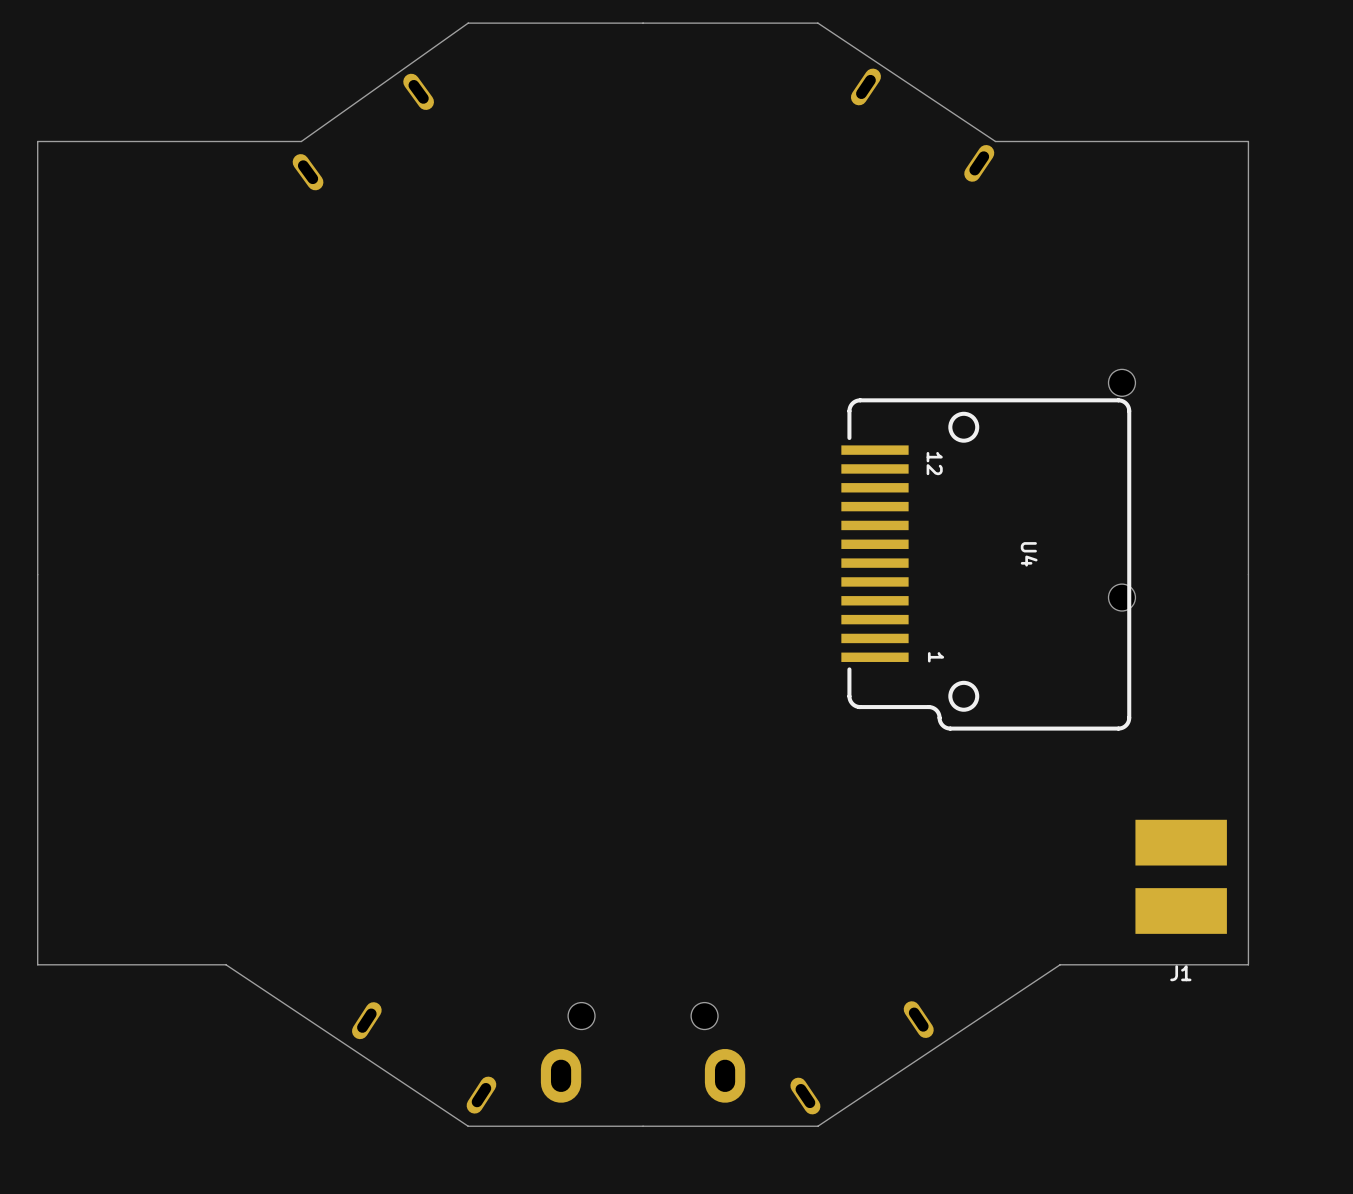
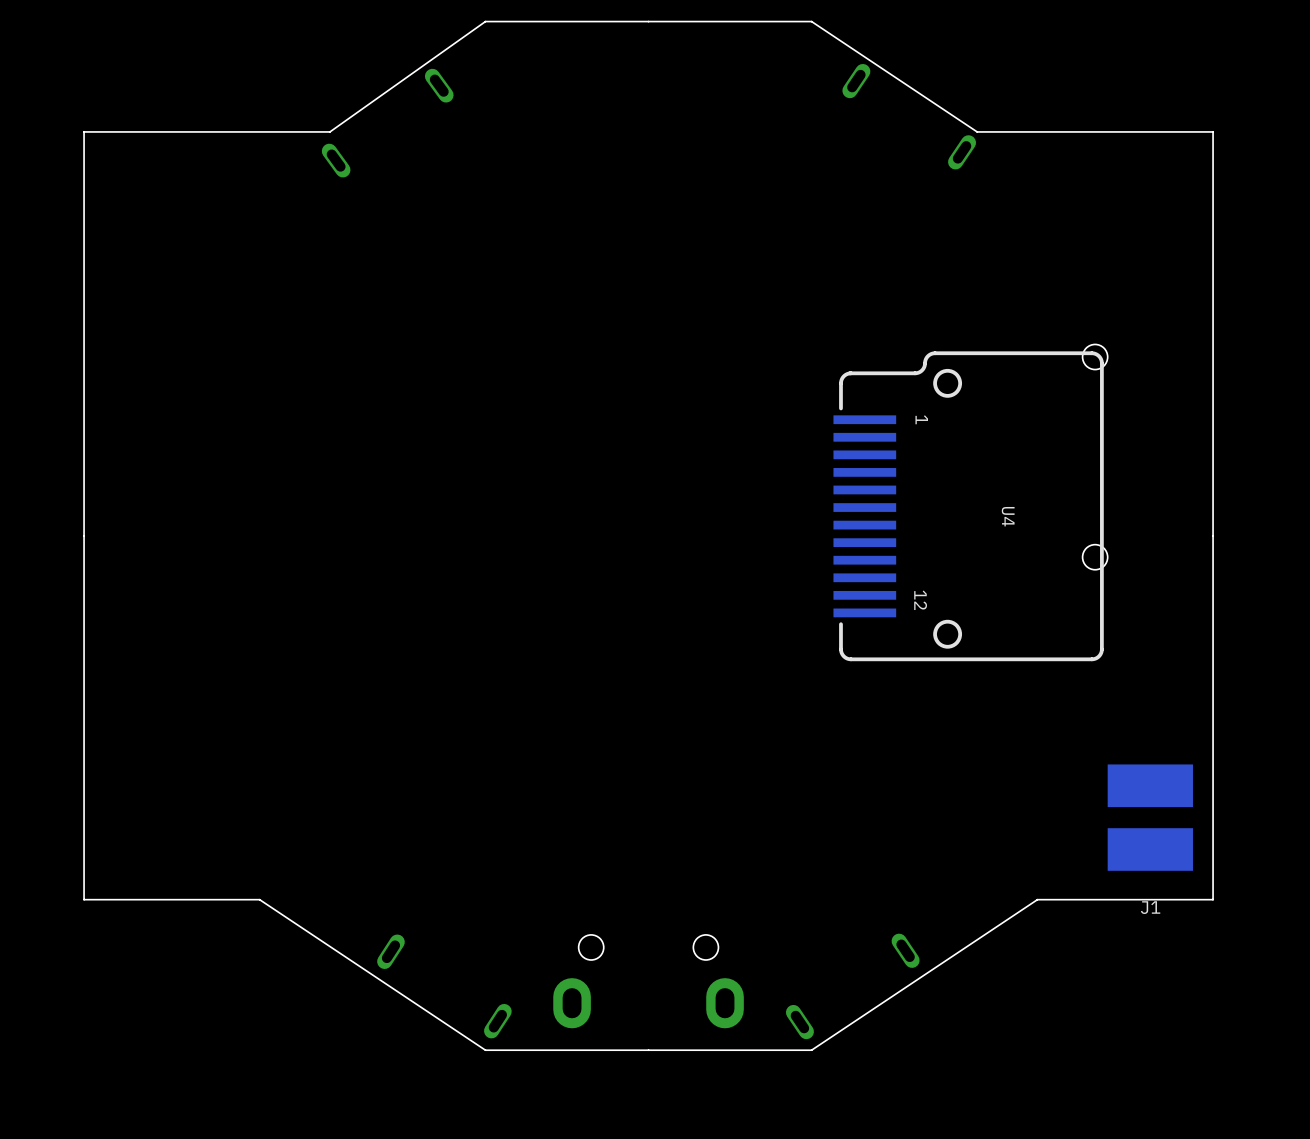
U4 footprint: [841, 398, 1132, 731] -> [833, 351, 1104, 662]

